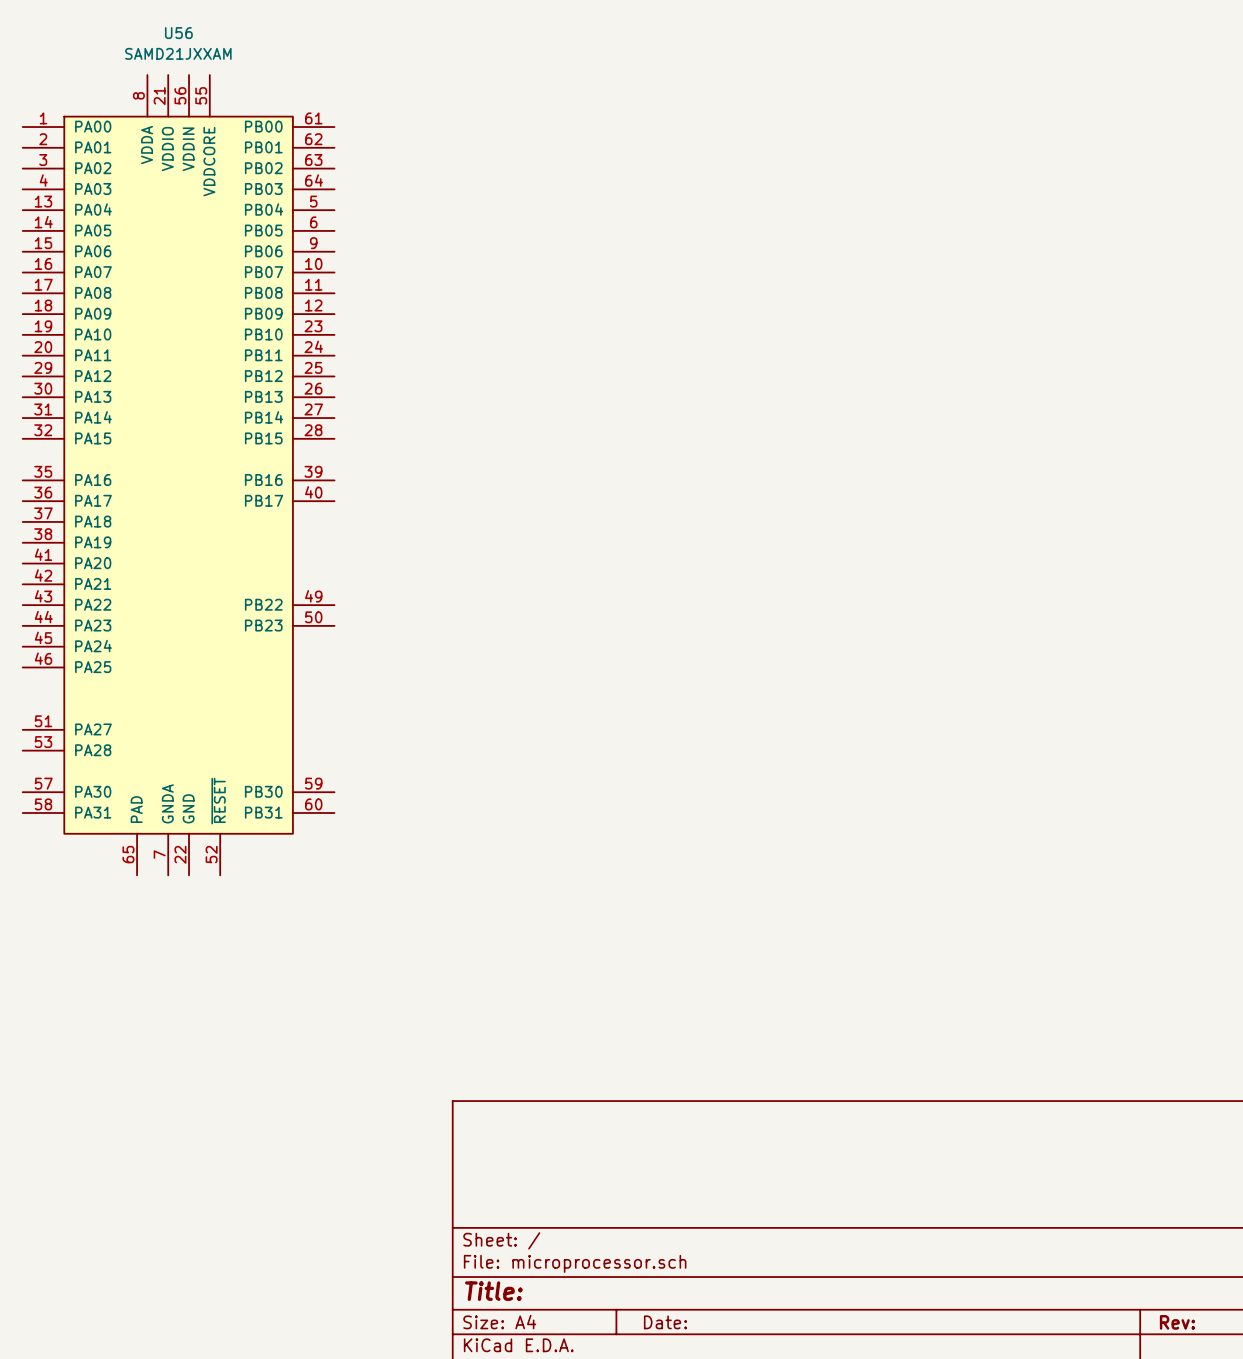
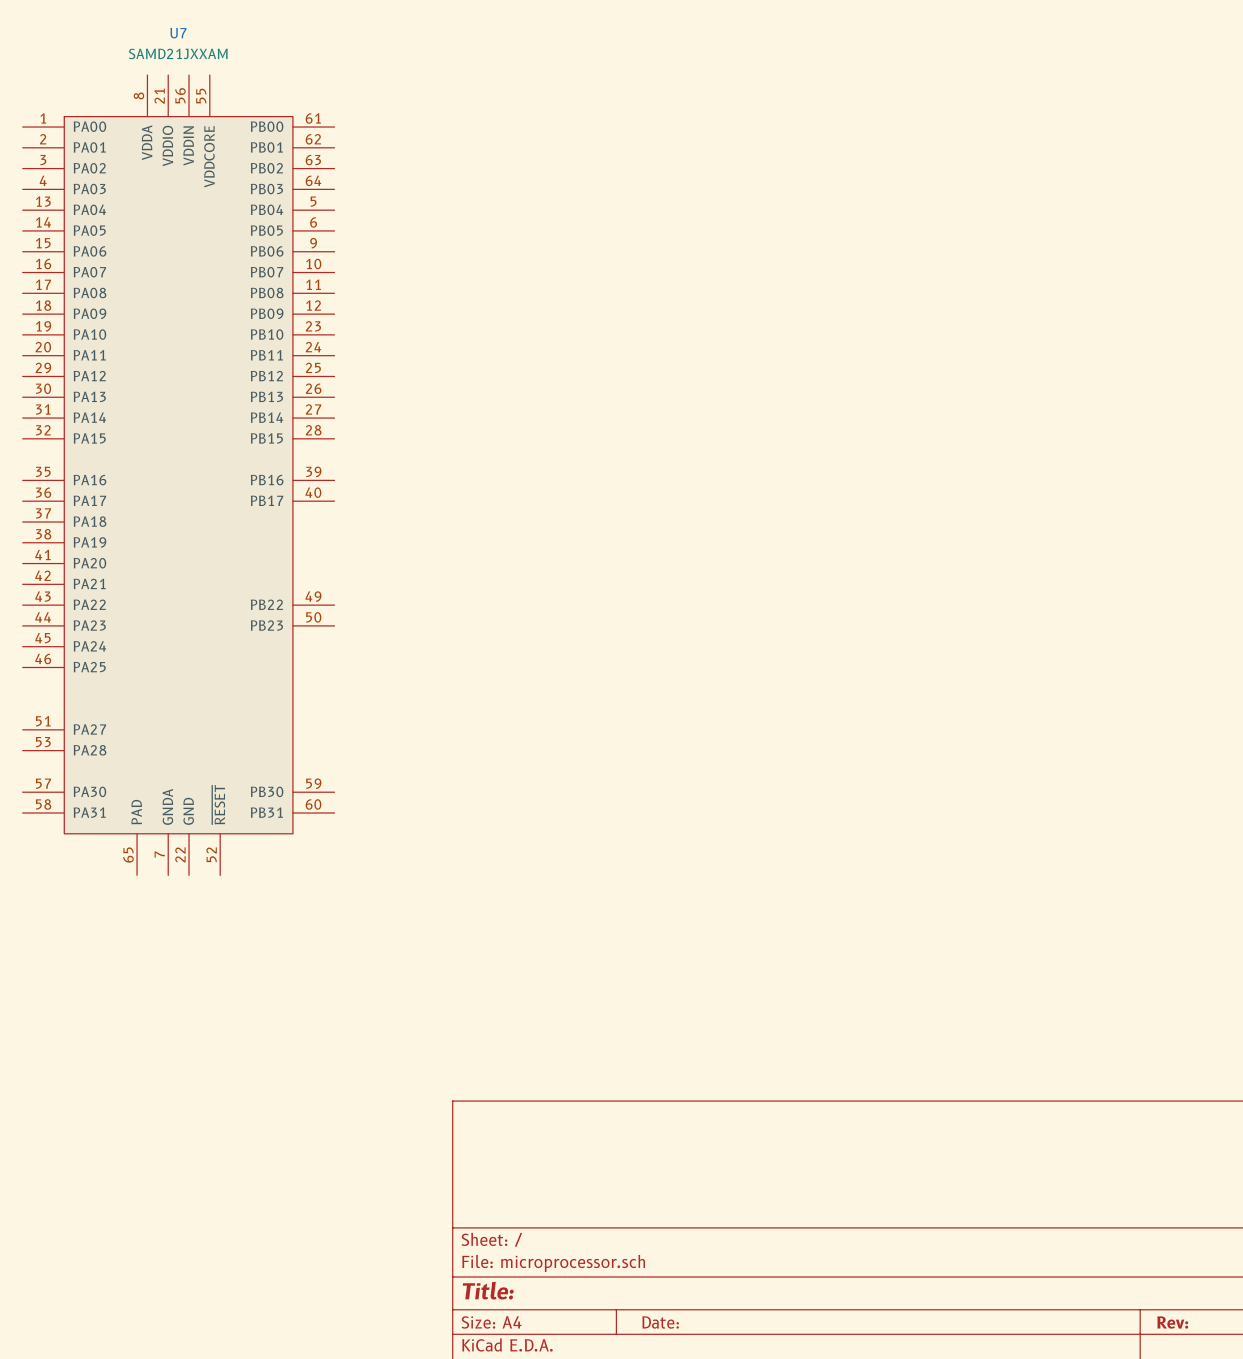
U56 name: U56 (178, 33) -> U7 (178, 33)

